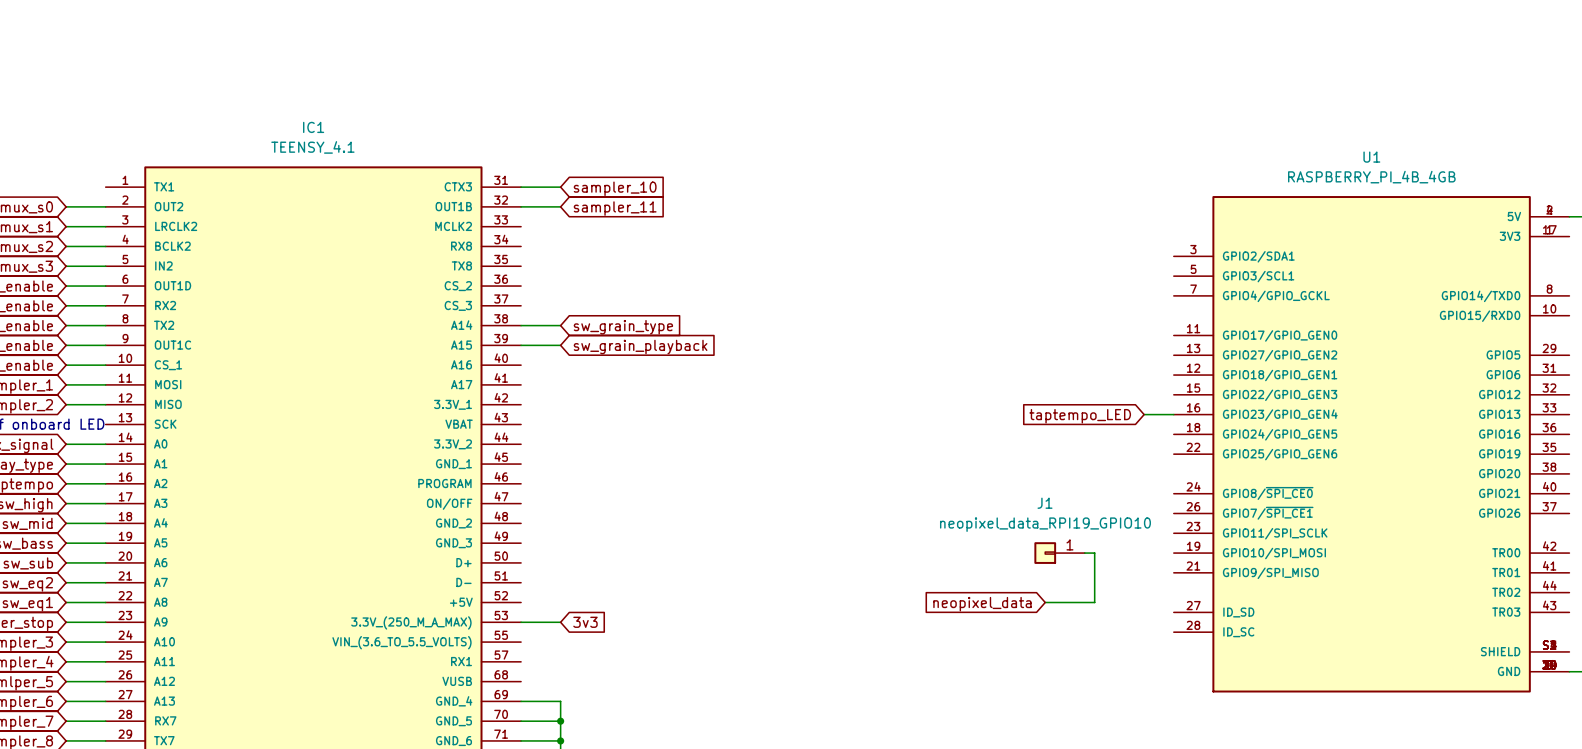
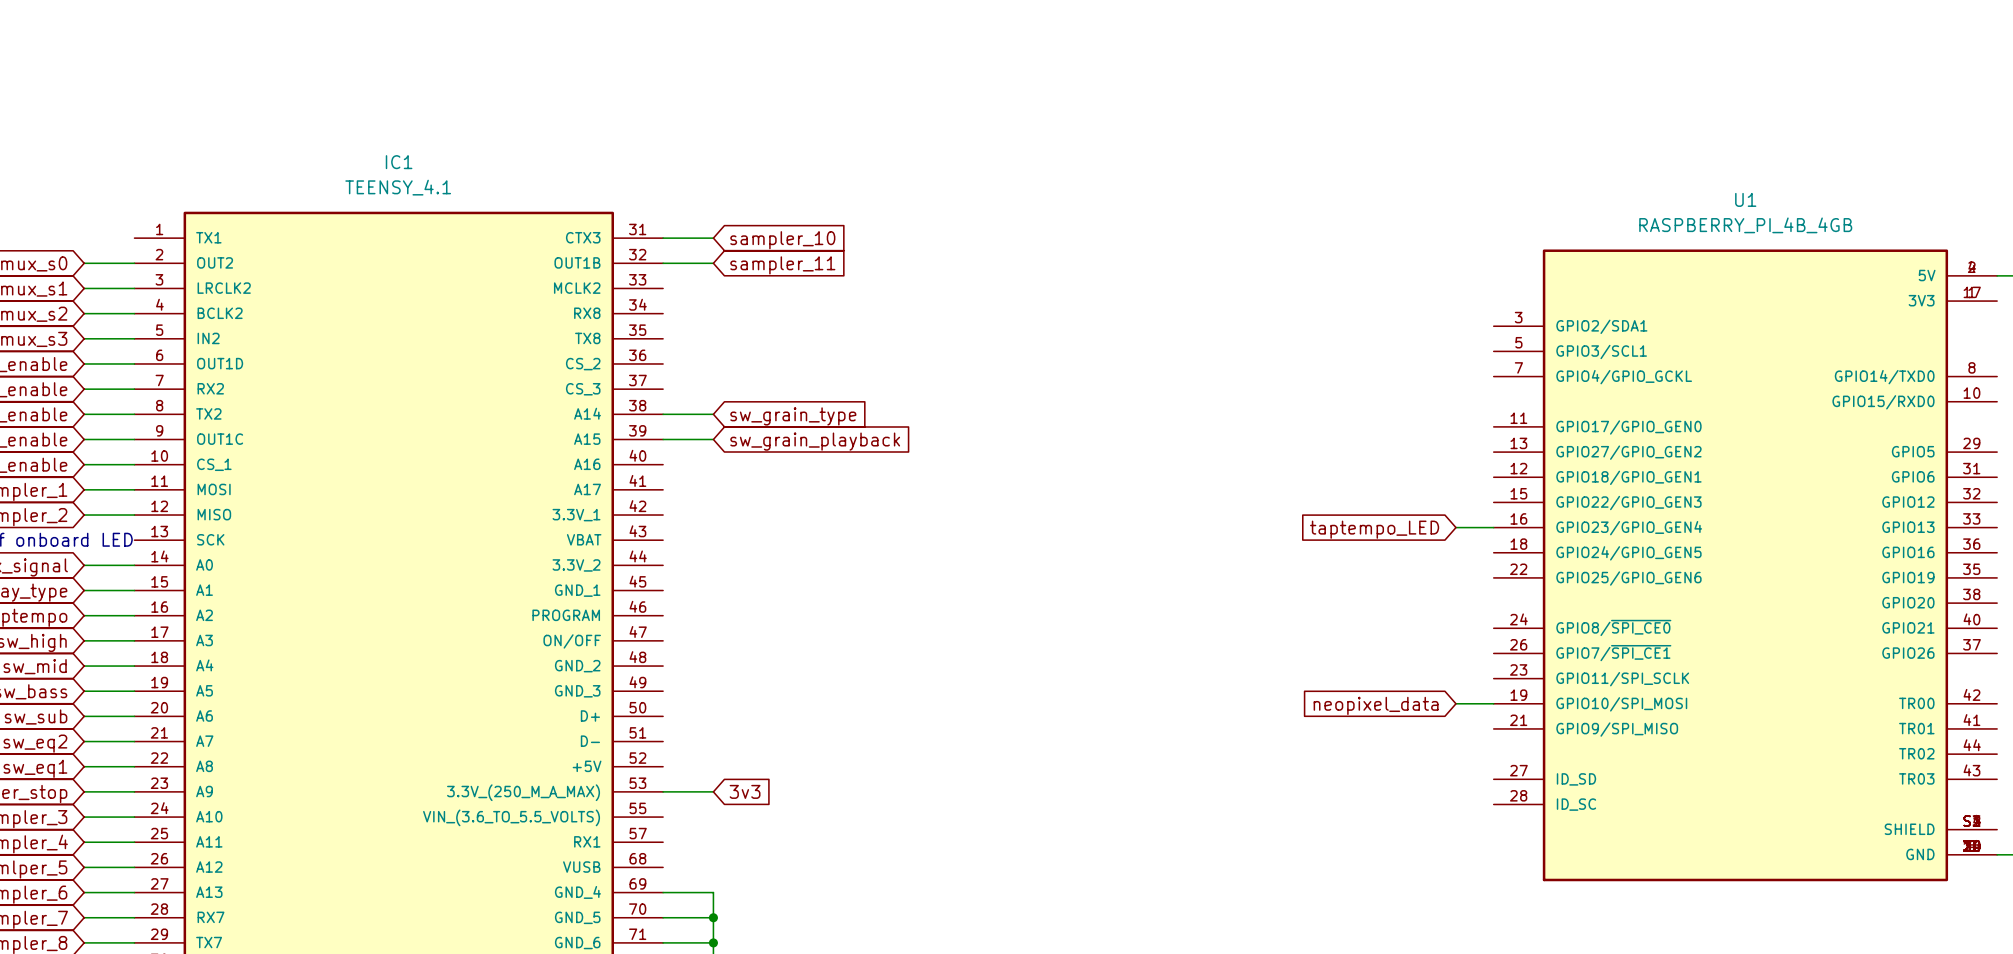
J1: neopixel_data_RPI19_GPIO10 (1059, 553) -> none
wire: (1084, 553) (1094, 553) (1094, 602) (1045, 602) -> none
wire: none -> (1455, 703) (1493, 703)
global label position: neopixel_data (982, 604) -> neopixel_data (1376, 705)

